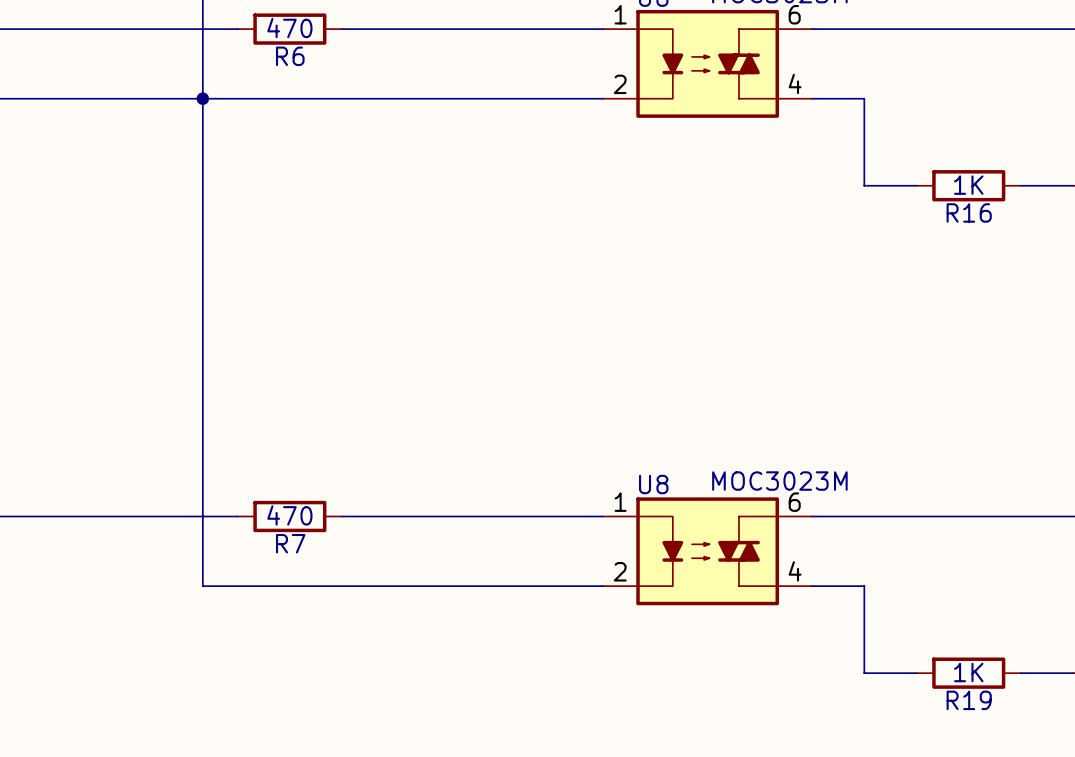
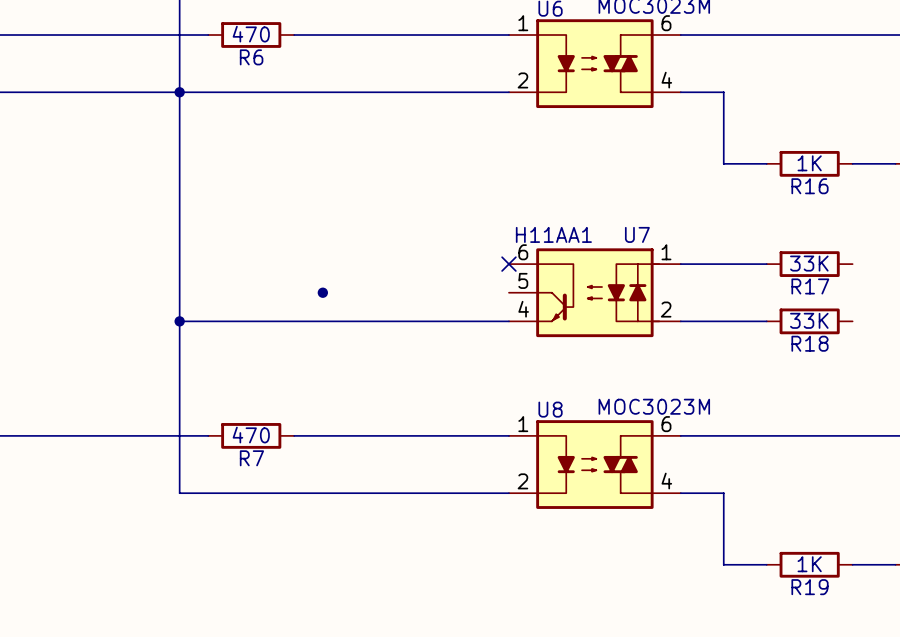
no-connect mark: none -> (508, 264)
wire: none -> (680, 264) (766, 264)
R17: none -> 33K (809, 264)
junction: none -> (322, 292)
U7: none -> H11AA1 (594, 292)
wire: none -> (179, 321) (508, 321)
junction: none -> (179, 321)
wire: none -> (680, 321) (766, 321)
R18: none -> 33K (809, 321)

